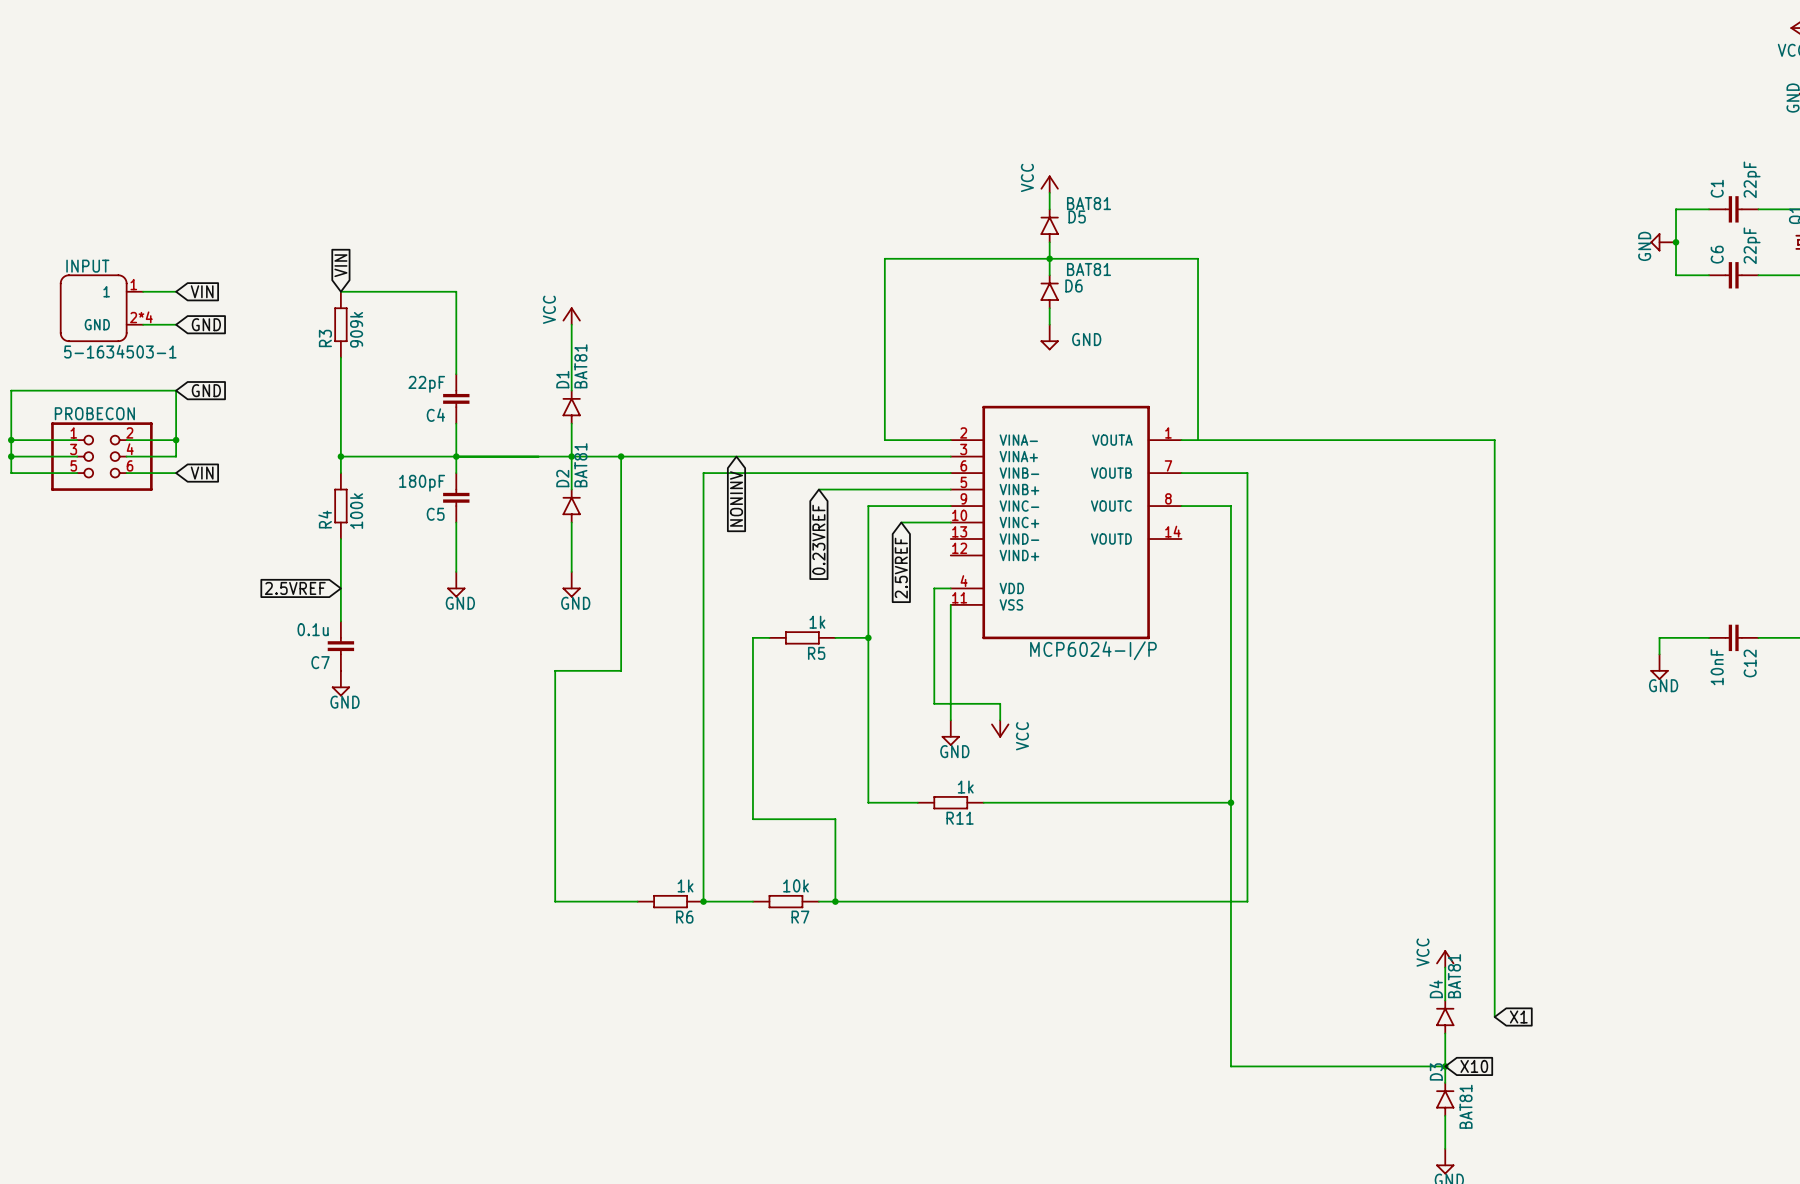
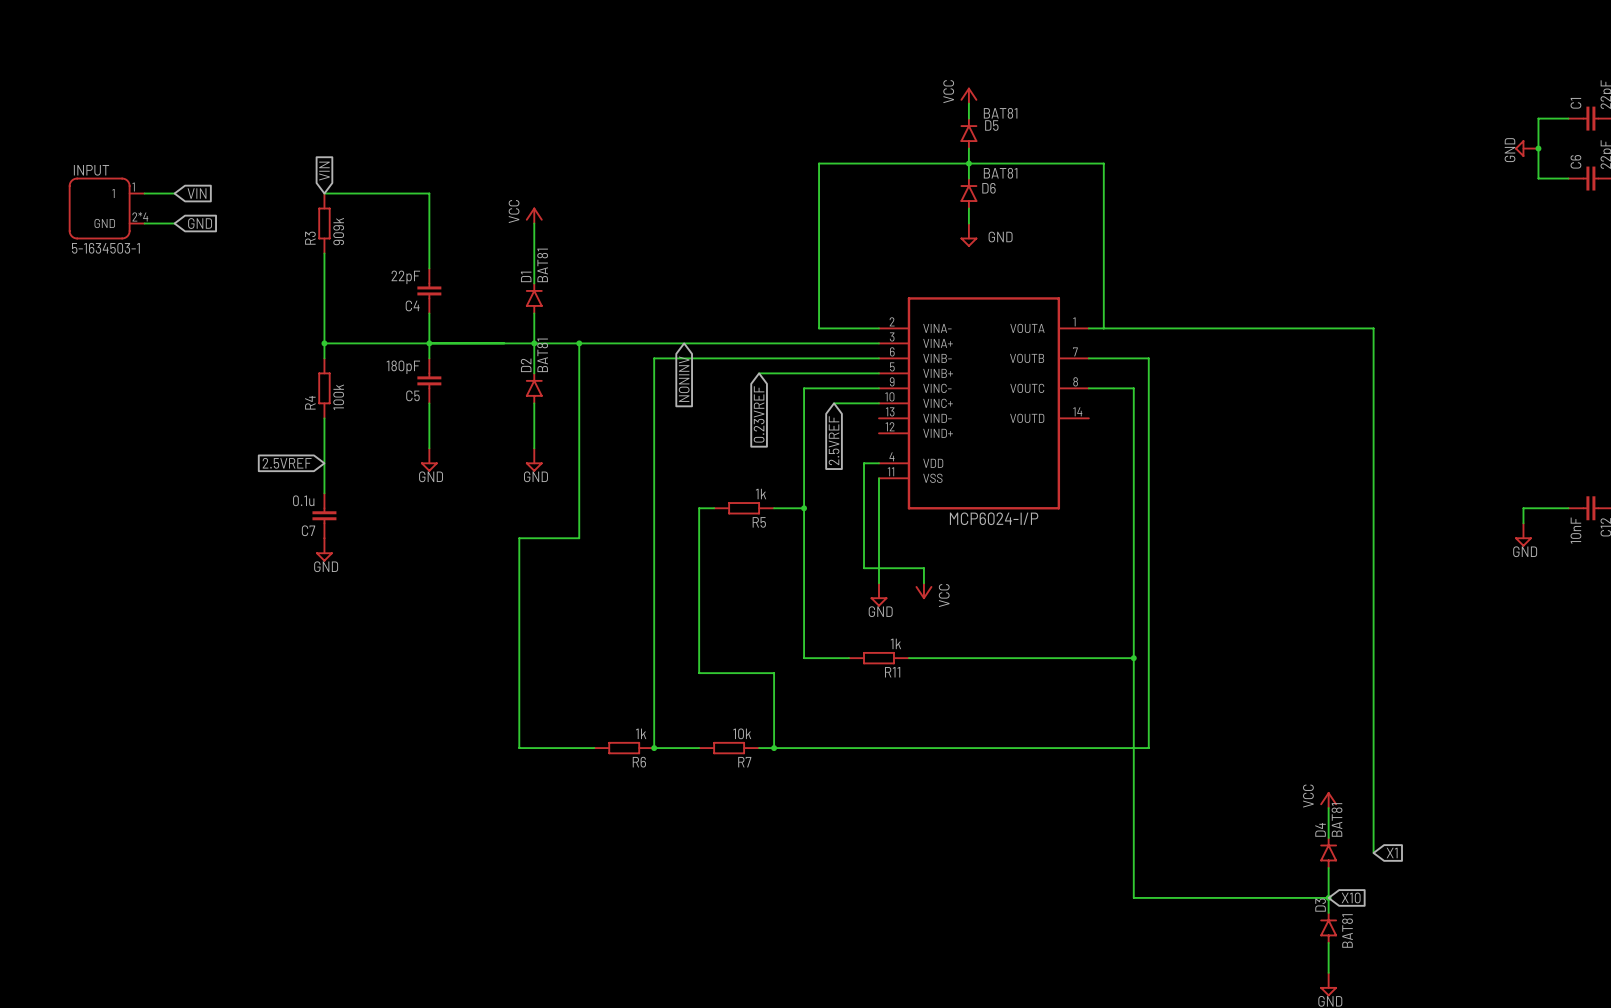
global label: GND (206, 390) -> none
wire: (11, 440) (77, 440) -> none
junction: (11, 440) -> none
wire: (126, 440) (176, 440) -> none
junction: (176, 440) -> none
wire: (11, 456) (77, 456) -> none
junction: (11, 456) -> none
PROBECON: (101, 456) -> none
wire: (126, 456) (176, 456) (176, 390) (11, 390) (11, 473) (77, 473) -> none
wire: (126, 473) (176, 473) -> none
global label: VIN (202, 473) -> none

